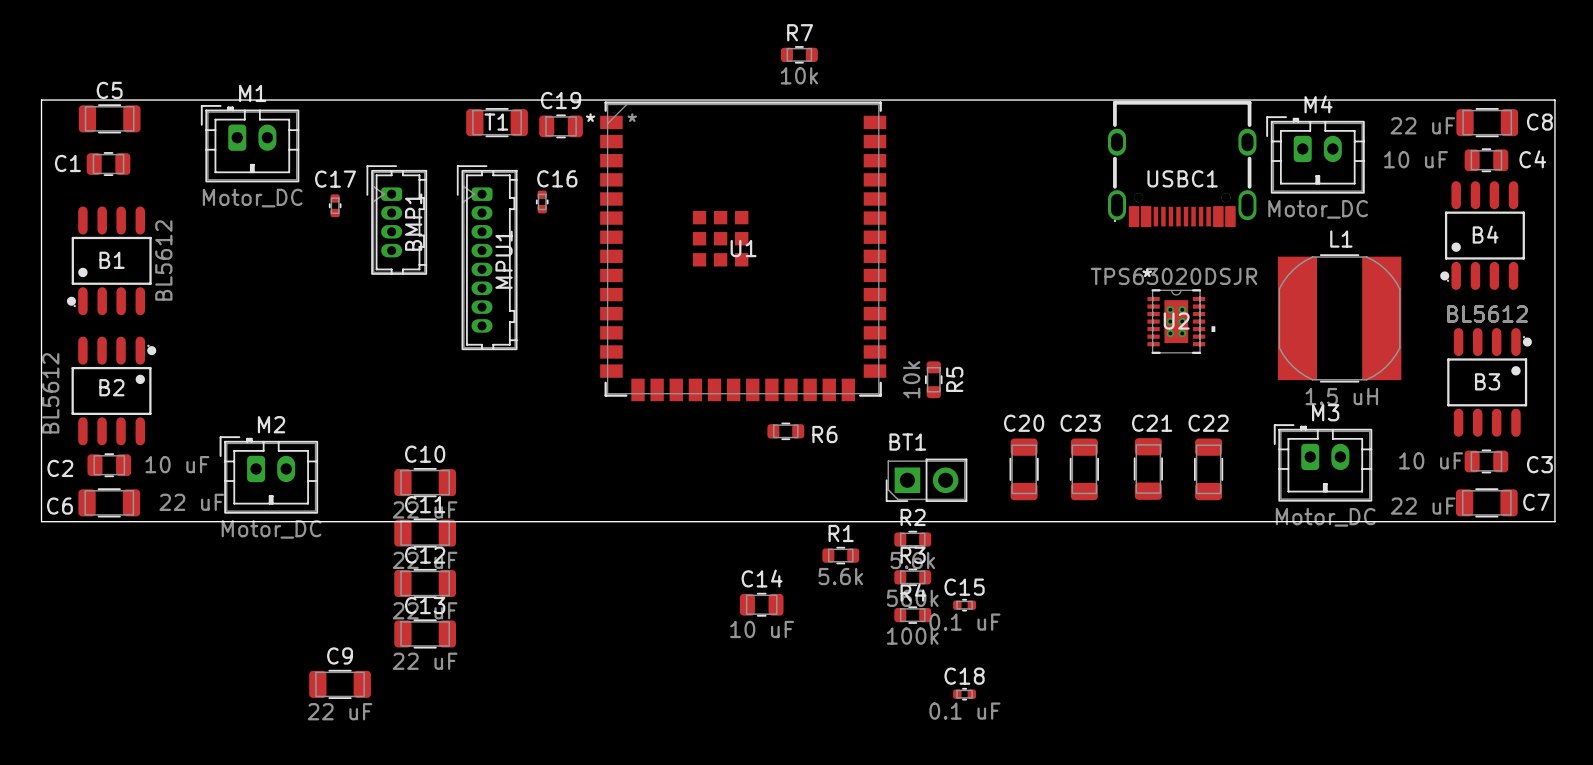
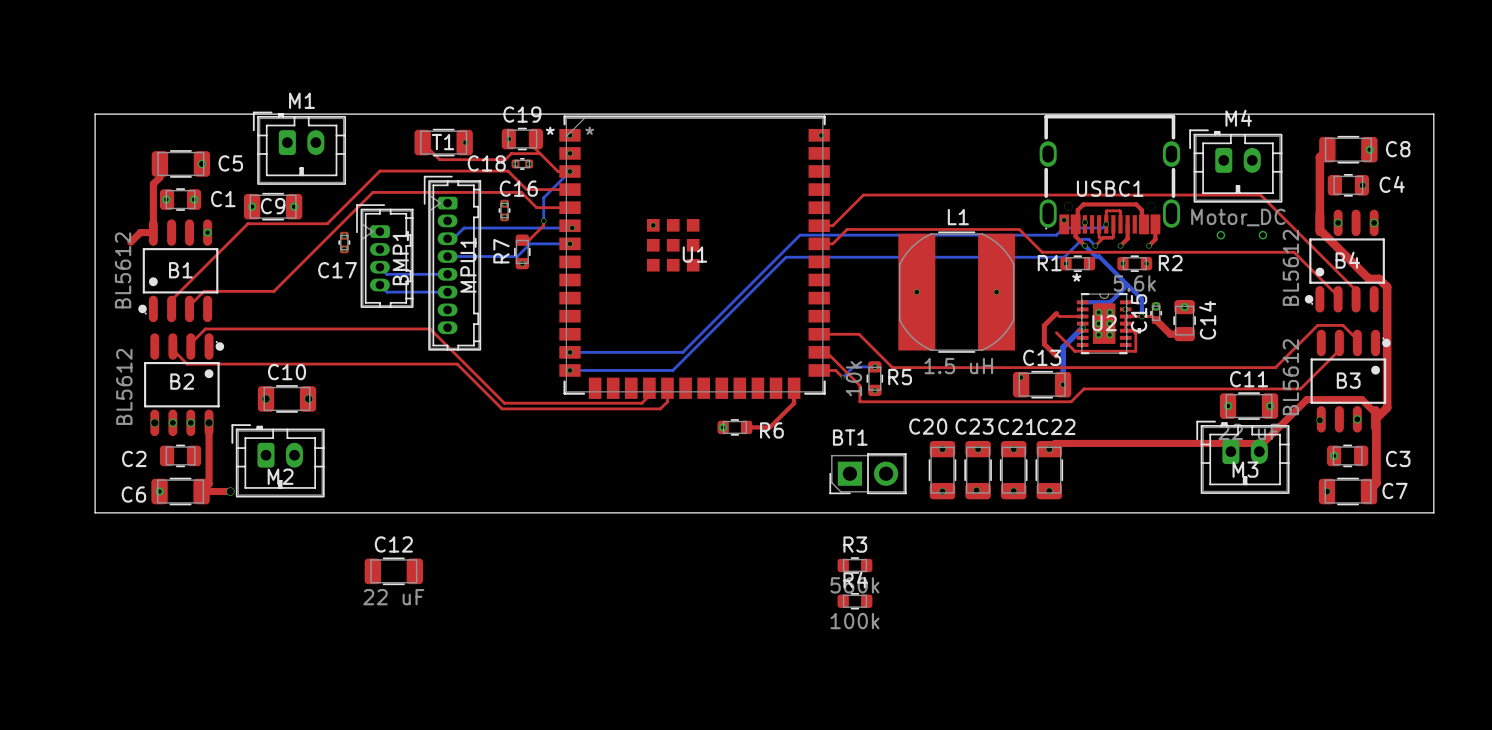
R7 name position: R7 (800, 32) -> R7 (501, 251)
R7 rotation: 0° (799, 54) -> 90° clockwise (522, 251)
R7 position: (799, 54) -> (522, 251)
R7 value: 10k (799, 75) -> none
C5 name position: C5 (109, 90) -> C5 (230, 163)
board edge: (109, 100) (41, 100) (41, 521) (109, 521) -> (95, 114) (95, 512)
board edge: (1524, 100) (1554, 100) (1554, 521) (1524, 521) -> (1433, 114) (1433, 512)
C5 position: (109, 118) -> (180, 163)
T1 position: (497, 122) -> (443, 142)
via: none -> (569, 135)
via: none -> (821, 135)
C8 position: (1487, 122) -> (1348, 149)
C8 value: 22 uF (1422, 125) -> none
via: none -> (508, 139)
top track: none -> (535, 139) (535, 149) (558, 171) (569, 171)
top track: none -> (422, 142) (439, 159) (505, 159) (511, 153) (540, 153)
via: none -> (465, 142)
top track: none -> (1327, 149) (1319, 157) (1319, 229) (1368, 278) (1378, 278) (1387, 287) (1387, 407) (1375, 419) (1375, 484)
via: none -> (1369, 149)
via: none -> (569, 153)
M1 position: (250, 143) -> (299, 148)
top track: none -> (159, 163) (159, 177) (153, 184) (153, 232) (140, 232) (130, 242)
via: none -> (201, 163)
via: none -> (515, 163)
via: none -> (529, 163)
C4 value: 10 uF (1416, 159) -> none
bottom track: none -> (569, 171) (543, 197) (543, 220)
via: none -> (569, 171)
C4 position: (1486, 160) -> (1348, 185)
C1 name position: C1 (67, 163) -> C1 (223, 199)
C1 position: (108, 164) -> (180, 199)
via: none -> (1362, 185)
C17 name position: C17 (335, 179) -> C17 (337, 270)
top track: none -> (569, 189) (526, 189) (508, 171) (379, 171) (327, 223) (247, 223) (171, 300) (171, 308)
via: none -> (166, 199)
via: none -> (194, 199)
via: none -> (504, 203)
via: none -> (252, 206)
via: none -> (294, 206)
M1 value: Motor_DC (252, 198) -> none
top track: none -> (569, 207) (536, 207) (521, 192) (372, 192) (273, 291) (203, 291) (189, 305) (189, 308)
C17 position: (335, 205) -> (344, 242)
via: none -> (504, 217)
top track: none -> (543, 220) (543, 225) (529, 240) (522, 240)
via: none -> (543, 220)
via: none -> (1064, 220)
via: none -> (1085, 222)
via: none -> (1338, 222)
via: none -> (1374, 222)
top track: none -> (1099, 224) (1099, 237) (1112, 237) (1113, 224)
top track: none -> (1106, 224) (1106, 210) (1119, 210) (1120, 224)
bottom track: none -> (1106, 224) (1102, 228) (1063, 228) (1056, 235) (800, 235) (682, 352) (569, 352)
via: none -> (1106, 224)
top track: none -> (1127, 224) (1127, 238) (1120, 245)
top track: none -> (1144, 224) (1141, 222) (1141, 210) (1136, 204) (1083, 204) (1077, 210) (1075, 236) (1084, 245)
top track: none -> (1155, 224) (1155, 239) (1148, 245)
via: none -> (653, 225)
top track: none -> (819, 225) (832, 225) (863, 195) (1260, 195) (1356, 290) (1356, 299)
BMP1 position: (396, 220) -> (384, 256)
bottom track: none -> (572, 228) (463, 228) (453, 238) (447, 238)
via: none -> (572, 228)
via: none -> (207, 232)
via: none -> (344, 235)
via: none -> (1220, 235)
via: none -> (1262, 235)
top track: none -> (1103, 237) (1095, 245)
B4 position: (1482, 235) -> (1344, 261)
bottom track: none -> (569, 243) (530, 243) (517, 256) (447, 256)
via: none -> (569, 243)
top track: none -> (819, 243) (832, 243) (847, 229) (1019, 229) (1042, 252) (1294, 252) (1338, 296) (1338, 299)
bottom track: none -> (1084, 245) (1095, 256) (1099, 256) (1141, 299) (1141, 316)
via: none -> (1084, 245)
bottom track: none -> (1095, 245) (1088, 239) (1082, 239) (1064, 257) (786, 257) (672, 370) (569, 370)
via: none -> (1095, 245)
via: none -> (1120, 245)
via: none -> (1148, 245)
via: none -> (344, 249)
via: none -> (522, 263)
via: none -> (1066, 263)
via: none -> (1123, 263)
via: none -> (1146, 263)
B1 position: (109, 260) -> (178, 270)
B1 value position: BL5612 (163, 260) -> BL5612 (123, 270)
bottom track: none -> (379, 267) (387, 274) (447, 274)
U2 value: TPS63020DSJR (1174, 276) -> none
bottom track: none -> (379, 285) (387, 292) (447, 292)
bottom track: none -> (1127, 285) (1110, 302) (1082, 302)
via: none -> (916, 292)
via: none -> (996, 292)
via: none -> (1156, 306)
via: none -> (1184, 307)
via: none -> (1125, 309)
top track: none -> (1082, 316) (1059, 316) (1056, 313) (1044, 325) (1044, 344) (1056, 356)
via: none -> (1141, 316)
B3 value rotation: 0° (1487, 314) -> 90° counterclockwise (1290, 377)
B4 value rotation: 0° (1487, 314) -> 90° counterclockwise (1290, 267)
L1 position: (1339, 318) -> (956, 292)
bottom track: none -> (1082, 327) (1063, 347) (1063, 384)
via: none -> (1082, 327)
top track: none -> (1056, 332) (1074, 351) (1135, 351) (1135, 333) (1132, 330) (1125, 330) (1125, 316) (1152, 316) (1170, 334) (1184, 334)
top track: none -> (819, 334) (859, 334) (892, 367) (1275, 367) (1317, 325) (1343, 325) (1357, 339) (1357, 342)
top track: none -> (1339, 342) (1339, 350) (1300, 388) (1083, 388) (1071, 401) (859, 401) (859, 385) (826, 352) (819, 352)
top track: none -> (172, 346) (172, 349) (187, 364) (457, 364) (502, 408) (660, 408) (667, 401) (667, 388)
top track: none -> (190, 346) (190, 343) (205, 328) (430, 328) (504, 403) (641, 403) (649, 395) (649, 388)
via: none -> (569, 352)
bottom track: none -> (874, 366) (853, 366) (842, 377)
via: none -> (874, 366)
via: none -> (569, 370)
top track: none -> (819, 370) (835, 370) (842, 377)
via: none -> (842, 377)
via: none -> (1020, 377)
R5 name rotation: 0° (954, 379) -> 90° clockwise (900, 377)
B3 position: (1489, 382) -> (1350, 381)
via: none -> (1063, 384)
top track: none -> (794, 388) (794, 403) (769, 427) (746, 427)
B2 position: (113, 390) -> (184, 384)
via: none -> (874, 390)
via: none -> (266, 398)
via: none -> (308, 398)
via: none -> (1228, 406)
via: none -> (1270, 406)
M3 name position: M3 (1325, 412) -> M3 (1245, 469)
via: none -> (1357, 419)
C20 name position: C20 (1024, 423) -> C20 (928, 426)
C22 name position: C22 (1208, 423) -> C22 (1056, 426)
via: none -> (1319, 420)
M2 name position: M2 (271, 424) -> M2 (280, 476)
via: none -> (154, 422)
via: none -> (172, 422)
via: none -> (190, 422)
top track: none -> (209, 422) (209, 484) (201, 491) (230, 491)
via: none -> (209, 422)
via: none -> (723, 427)
via: none -> (942, 449)
via: none -> (978, 449)
via: none -> (1013, 449)
top track: none -> (1049, 449) (1054, 443) (1262, 443) (1306, 399) (1361, 399) (1377, 414) (1377, 483) (1369, 491)
via: none -> (1049, 449)
C3 value: 10 uF (1431, 460) -> none
via: none -> (1334, 455)
C3 position: (1486, 461) -> (1347, 455)
C2 value: 10 uF (177, 464) -> none
C2 position: (109, 465) -> (180, 455)
C21 position: (1148, 468) -> (1013, 470)
C20 position: (1024, 469) -> (942, 470)
C23 position: (1084, 469) -> (978, 470)
C22 position: (1208, 469) -> (1049, 470)
M2 position: (268, 475) -> (278, 460)
C10 position: (425, 482) -> (287, 398)
via: none -> (976, 490)
via: none -> (1013, 491)
via: none -> (1049, 491)
via: none -> (159, 491)
via: none -> (230, 491)
via: none -> (942, 491)
via: none -> (1327, 491)
C6 position: (109, 502) -> (180, 491)
C6 value: 22 uF (191, 502) -> none
C7 position: (1486, 502) -> (1348, 491)
C7 value: 22 uF (1423, 506) -> none
C10 value: 22 uF (425, 509) -> none
R2 name position: R2 (913, 517) -> R2 (1170, 263)
M3 value: Motor_DC (1325, 517) -> none
M2 value: Motor_DC (271, 529) -> none
C11 position: (425, 533) -> (1249, 406)
R1 name position: R1 (841, 533) -> R1 (1049, 263)
R2 position: (912, 539) -> (1134, 263)
R1 position: (840, 555) -> (1077, 263)
R1 value: 5.6k (840, 576) -> none
C14 rotation: 0° (761, 604) -> 90° clockwise (1184, 320)
C14 position: (761, 604) -> (1184, 320)
C15 rotation: 0° (964, 605) -> 90° clockwise (1156, 313)
C15 position: (964, 605) -> (1156, 313)
C15 value: 0.1 uF (964, 622) -> none
C14 value: 10 uF (762, 629) -> none
C13 position: (425, 633) -> (1042, 384)
C9 name position: C9 (340, 655) -> C9 (273, 206)
C13 value: 22 uF (425, 661) -> none
C18 name position: C18 (964, 676) -> C18 (486, 163)
C9 position: (340, 684) -> (273, 206)
C18 position: (964, 694) -> (522, 163)
C9 value: 22 uF (340, 711) -> none
C18 value: 0.1 uF (964, 711) -> none

